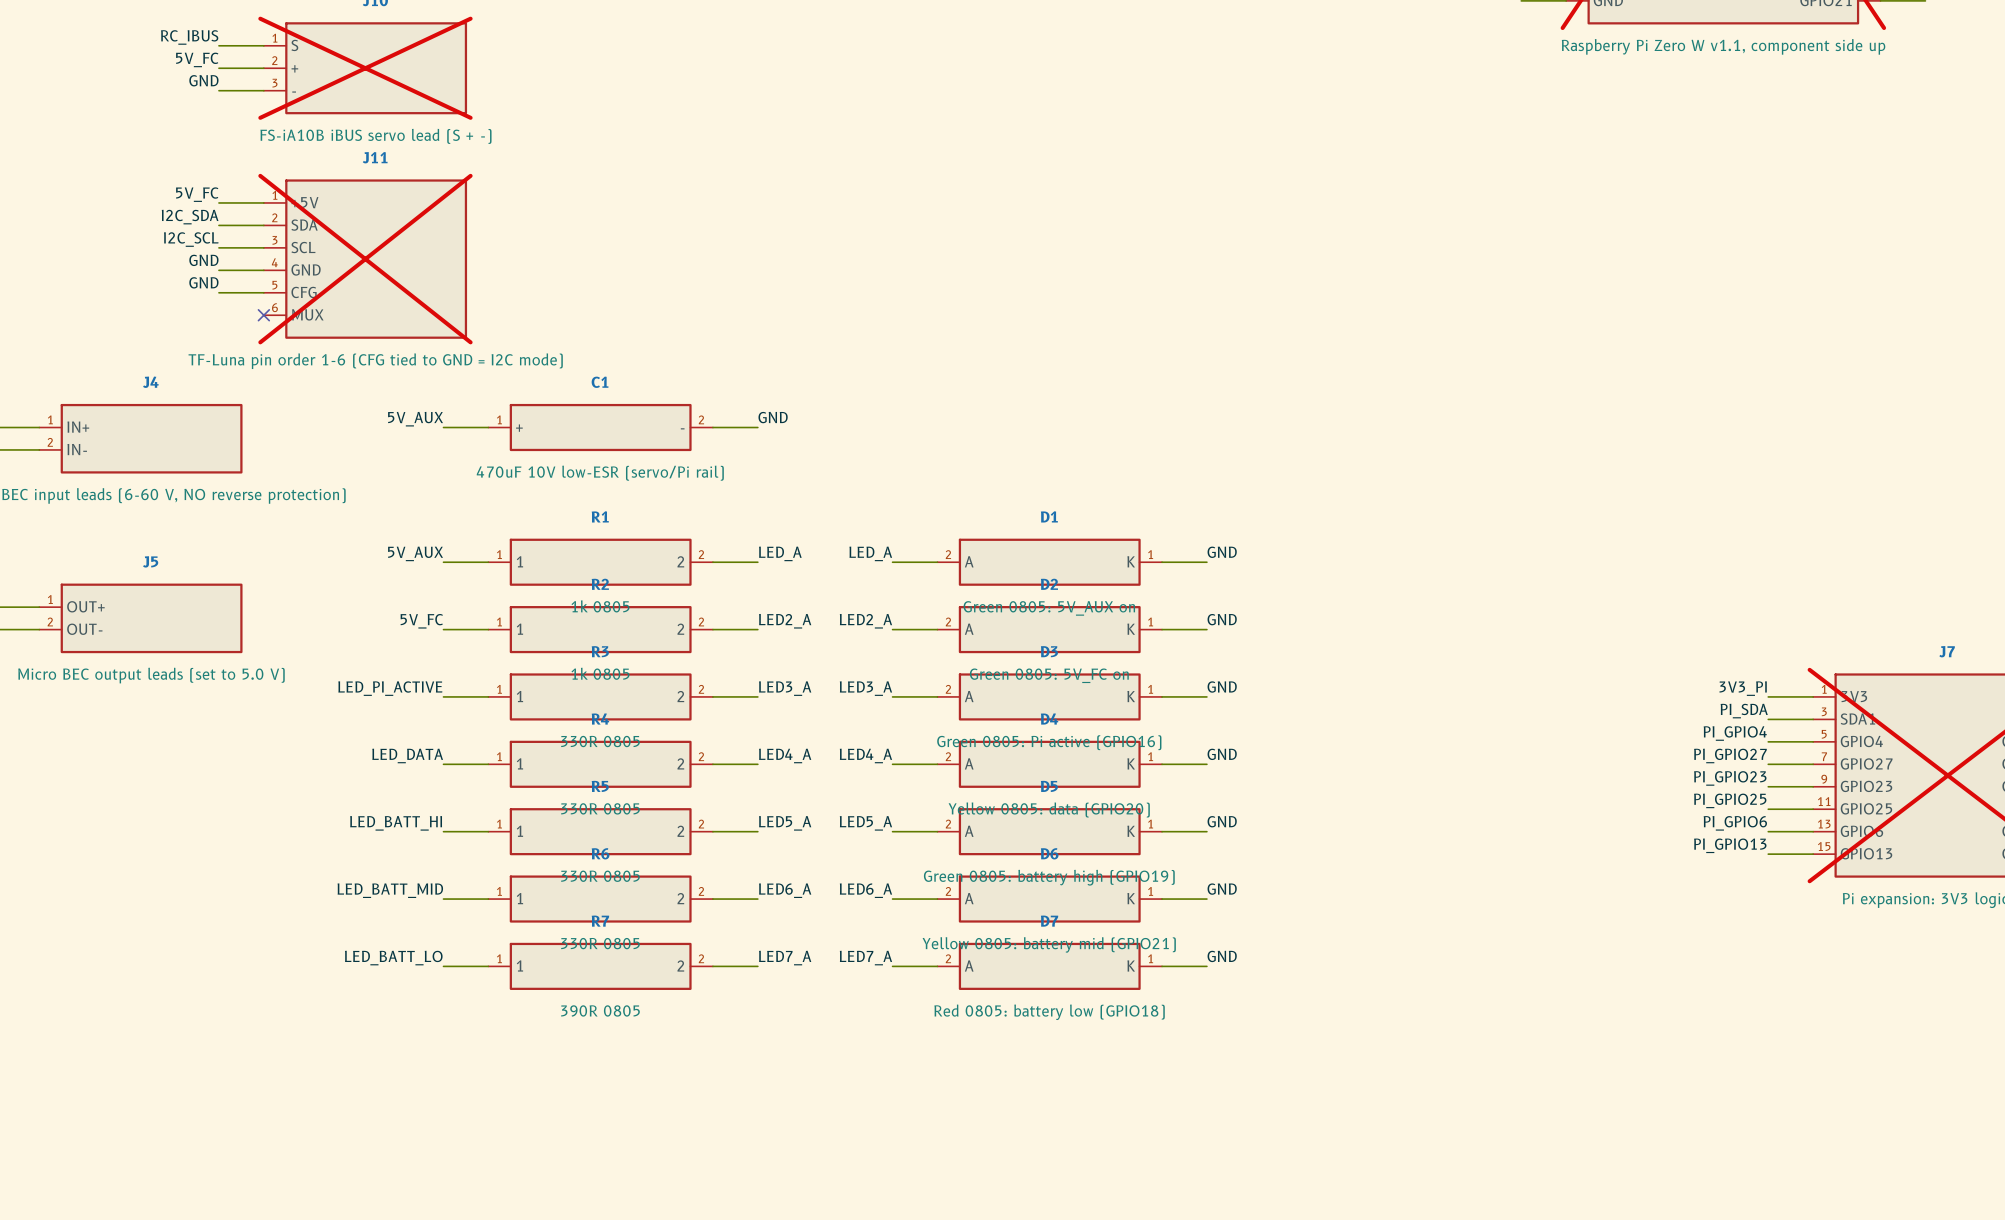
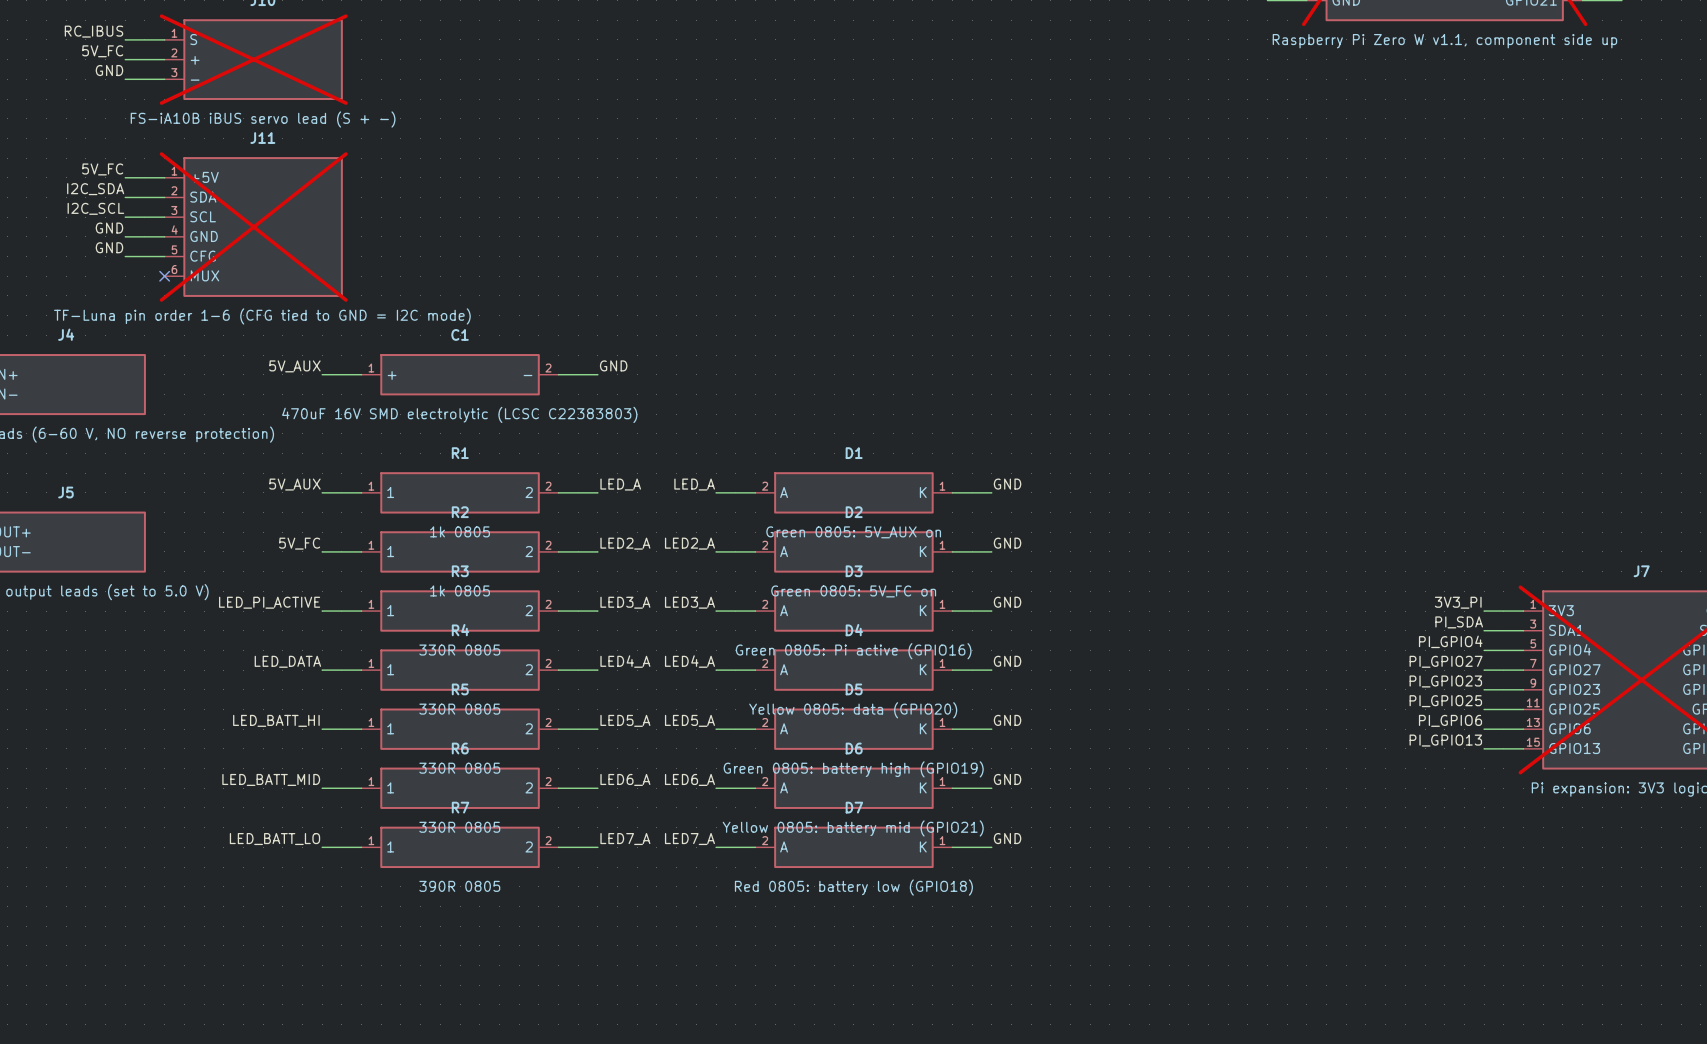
C1 value: 470uF 10V low-ESR (servo/Pi rail) (600, 473) -> 470uF 16V SMD electrolytic (LCSC C22383803) (459, 414)

